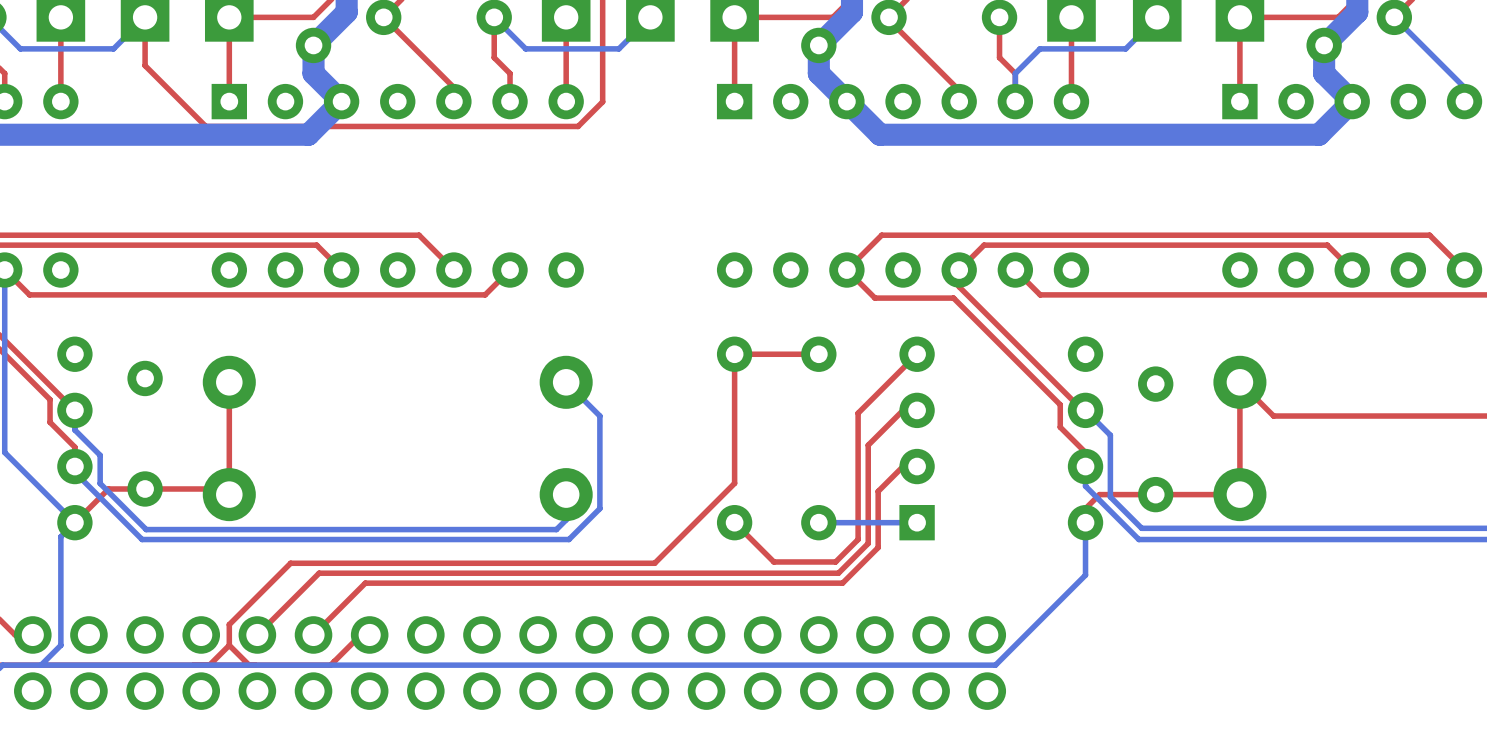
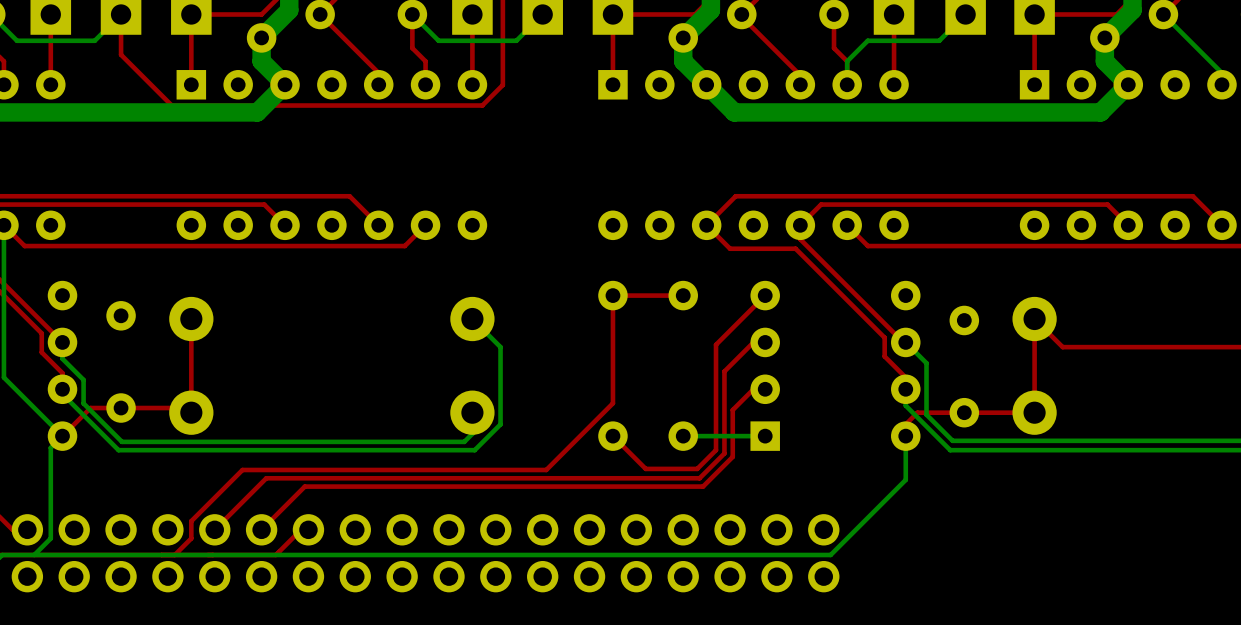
top track: (229, 645) (249, 665) -> none

